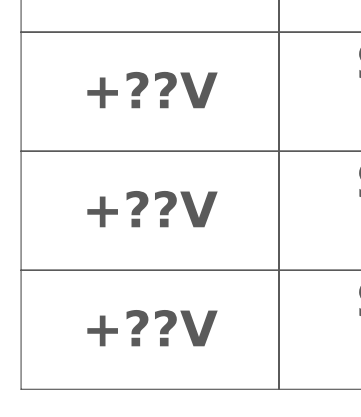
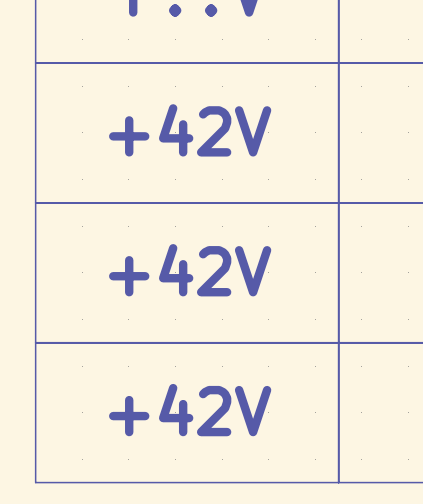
text: +??V (152, 90) -> +42V (190, 130)
text: +??V (152, 209) -> +42V (190, 270)
text: +??V (152, 328) -> +42V (190, 410)

